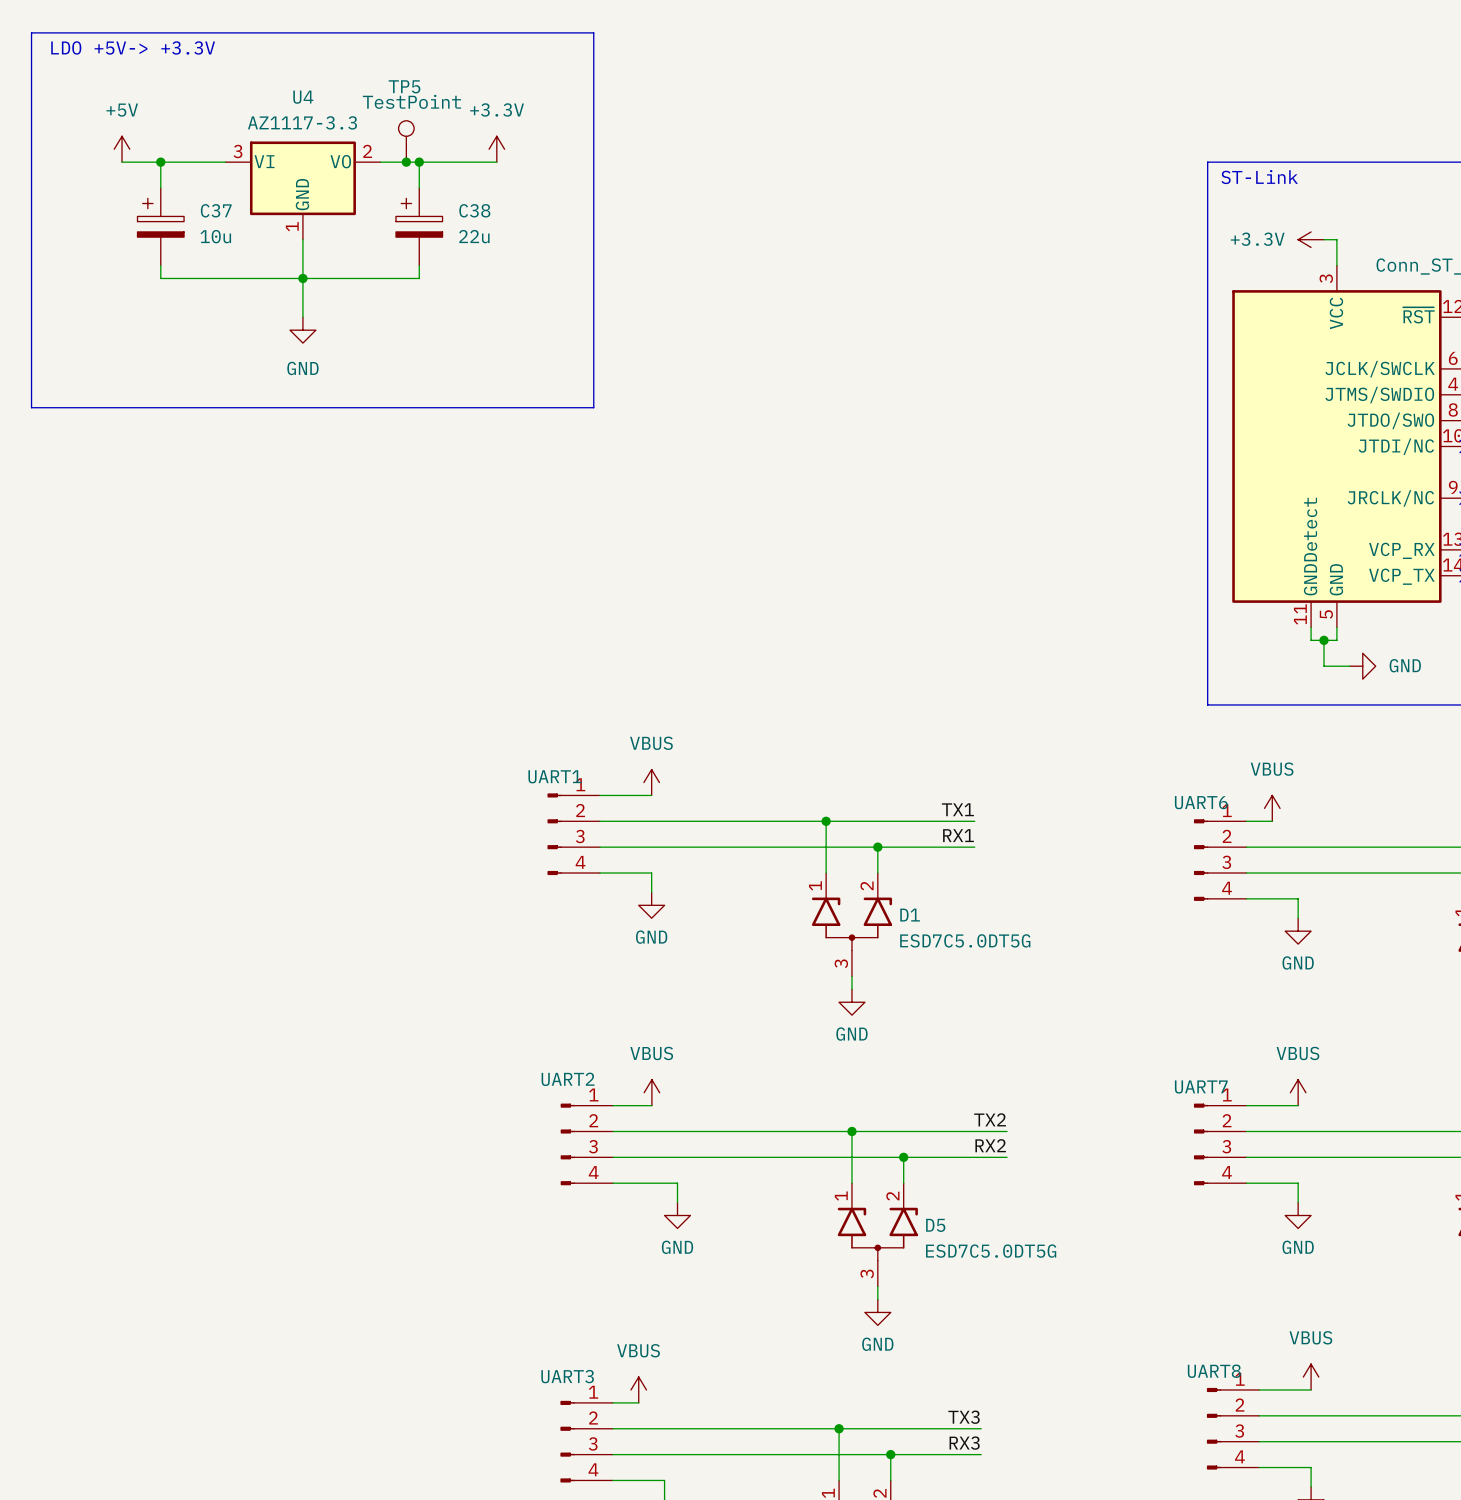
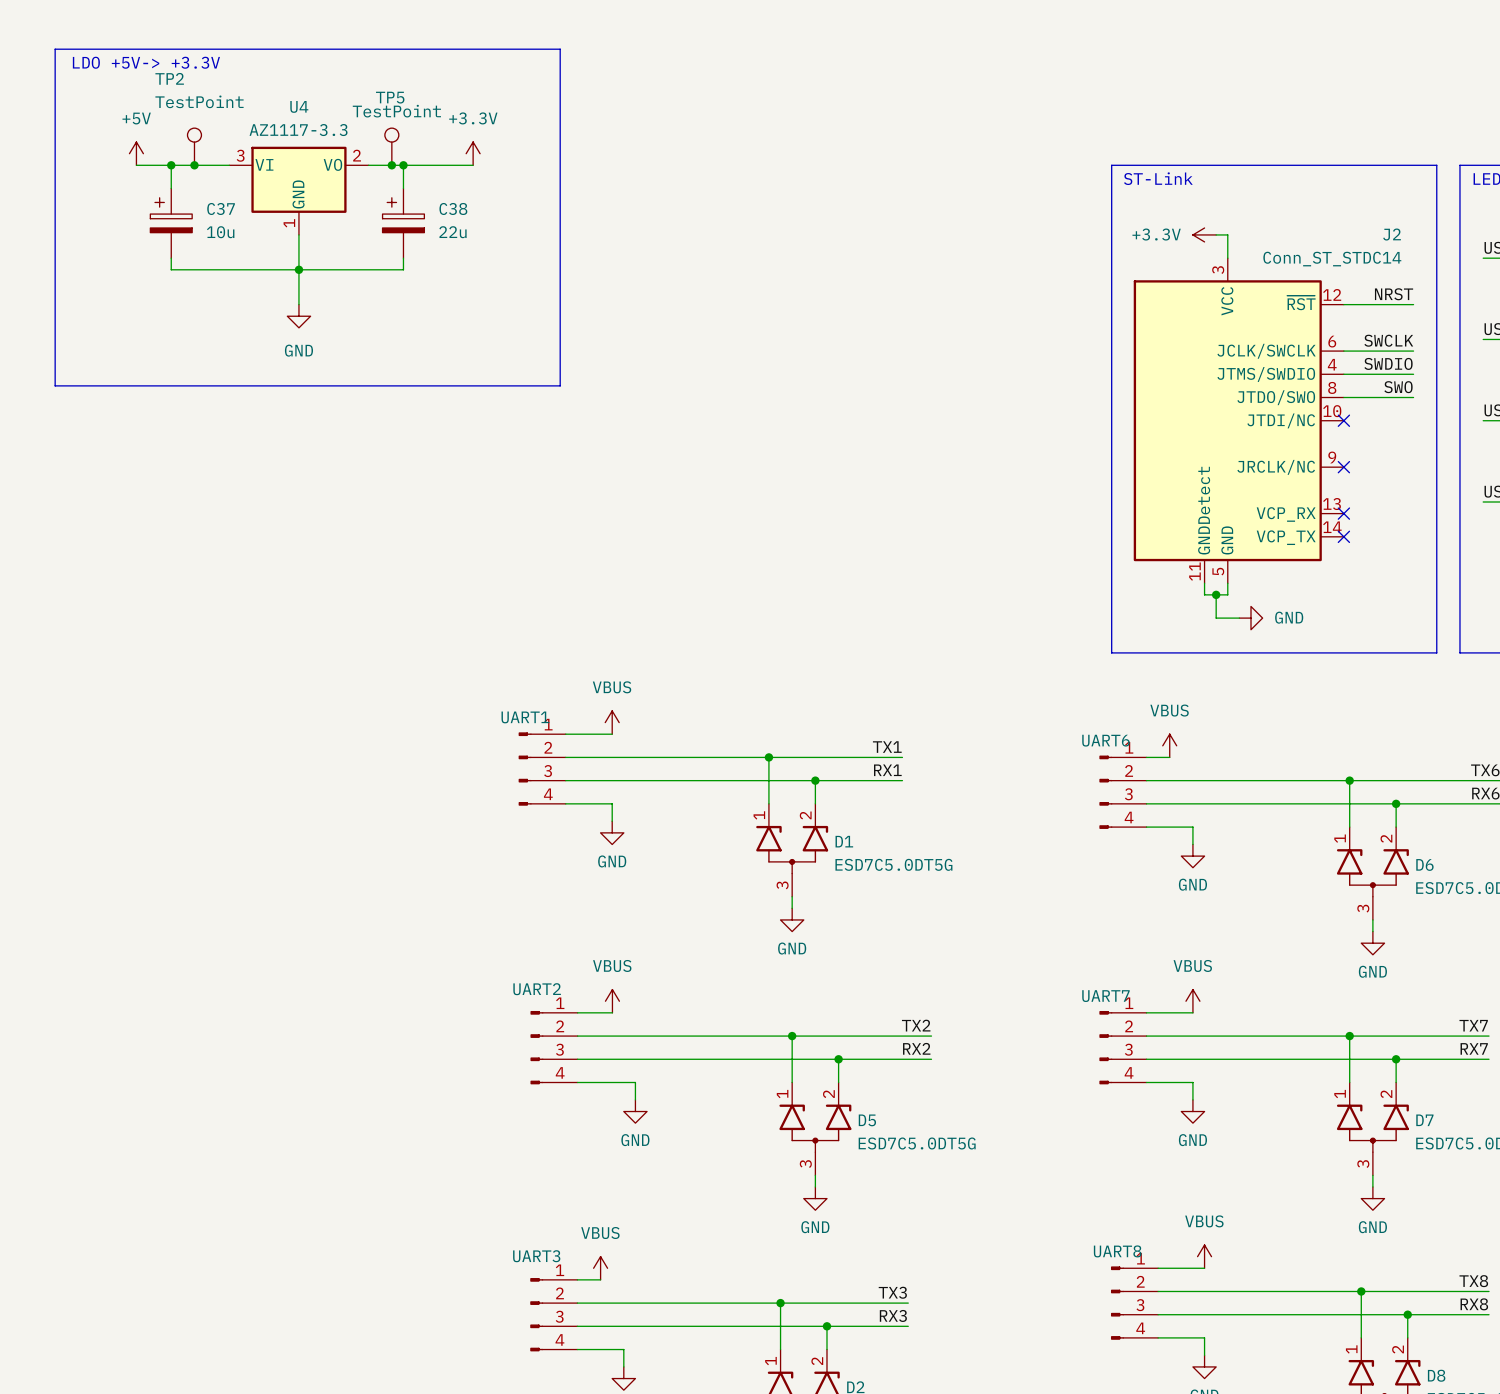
TP2: none -> TestPoint (194, 146)
junction: none -> (194, 165)

